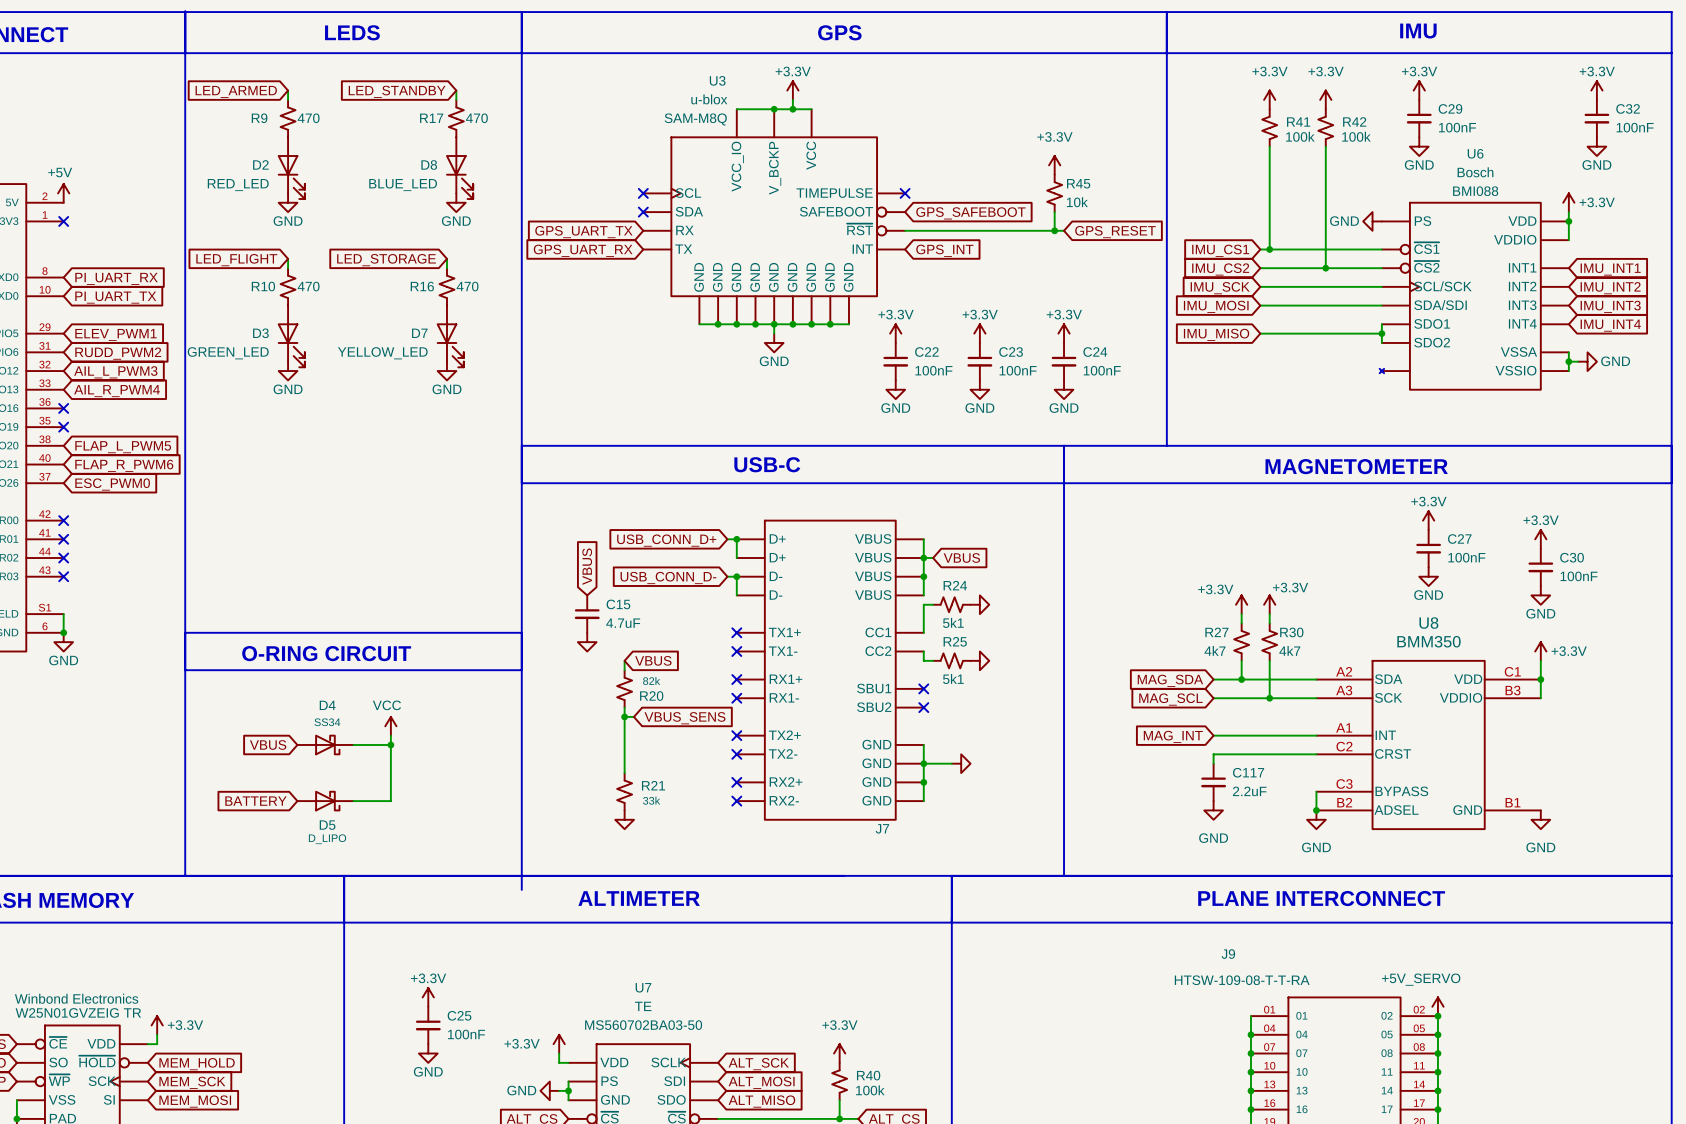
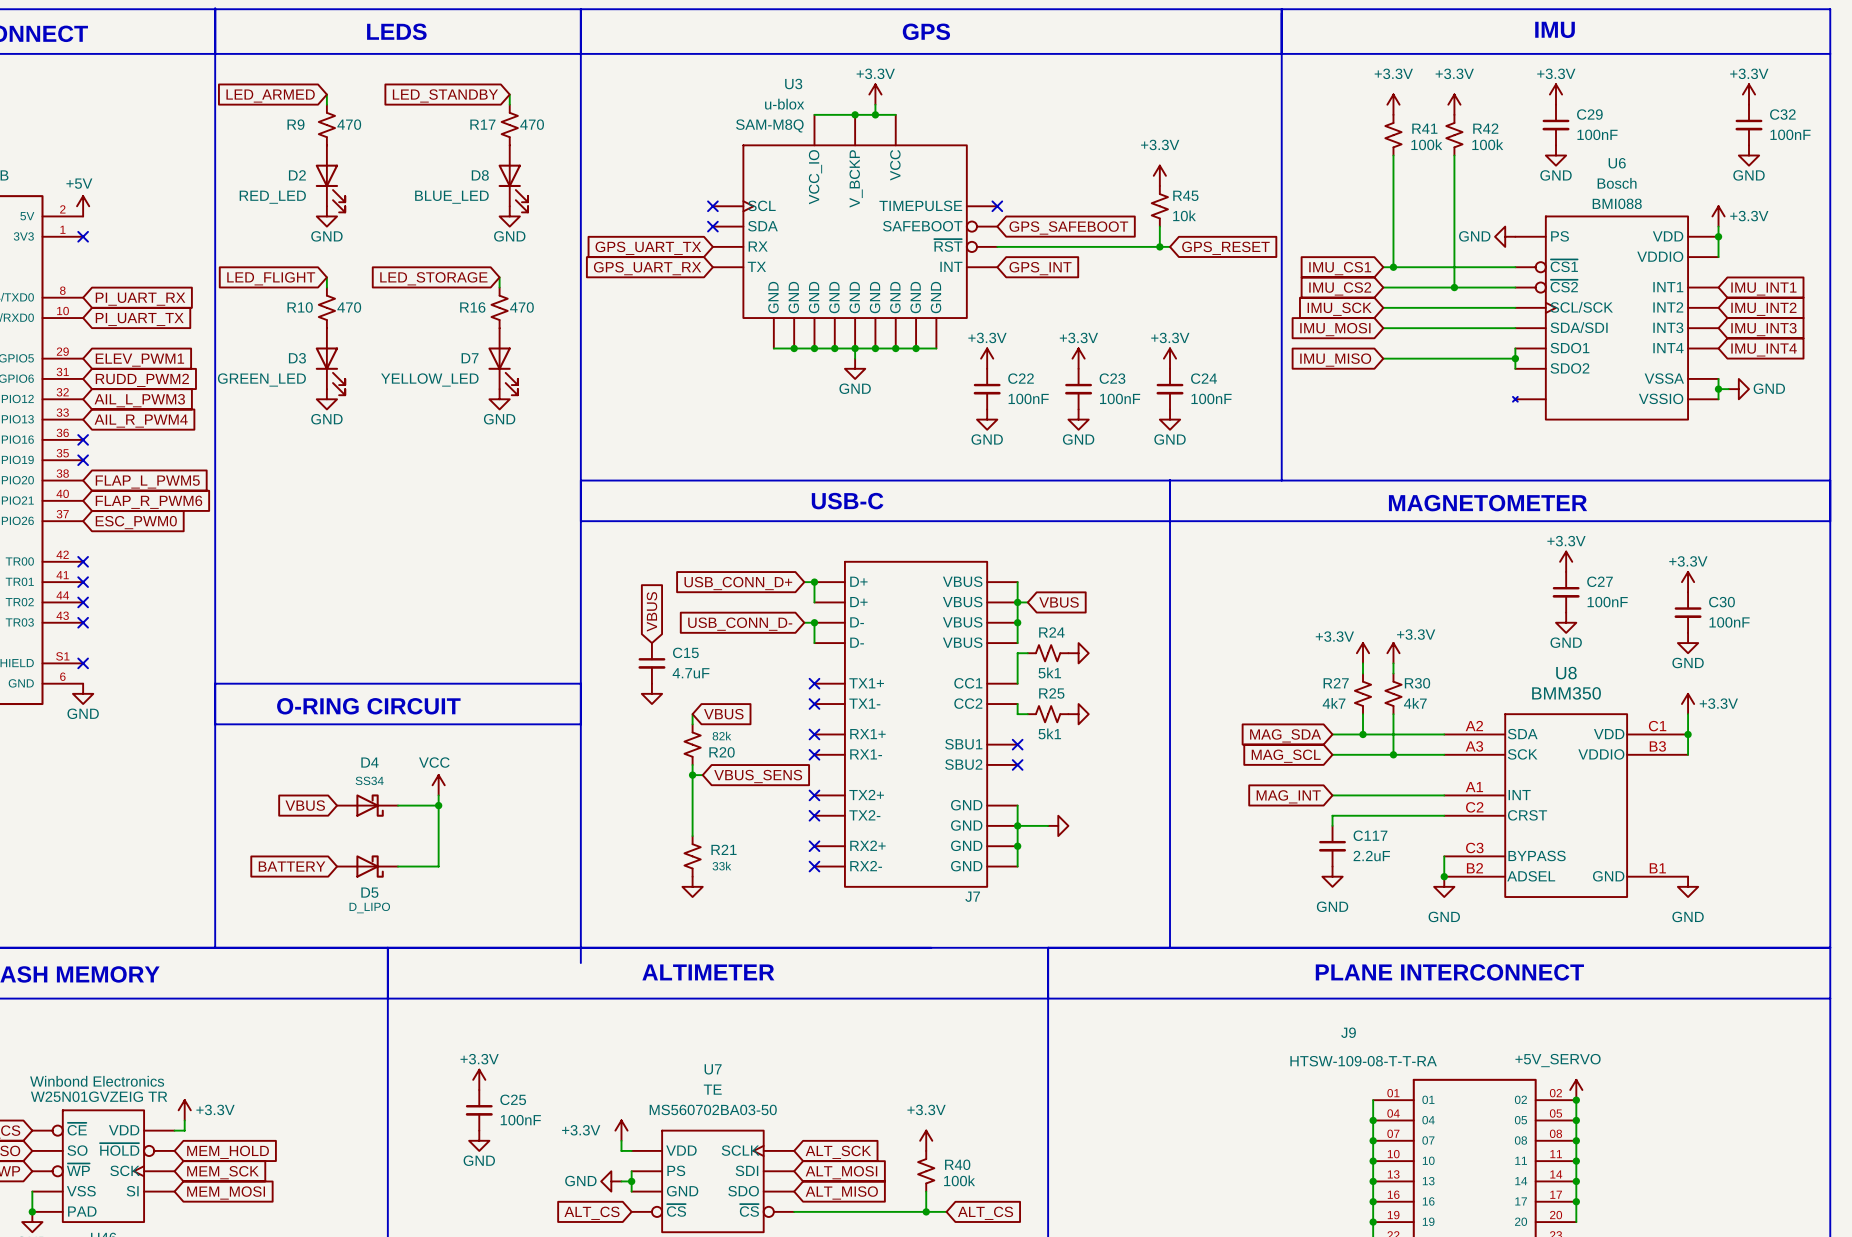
wire: (63, 614) (63, 632) -> none
no-connect mark: none -> (83, 663)
junction: (63, 632) -> none

